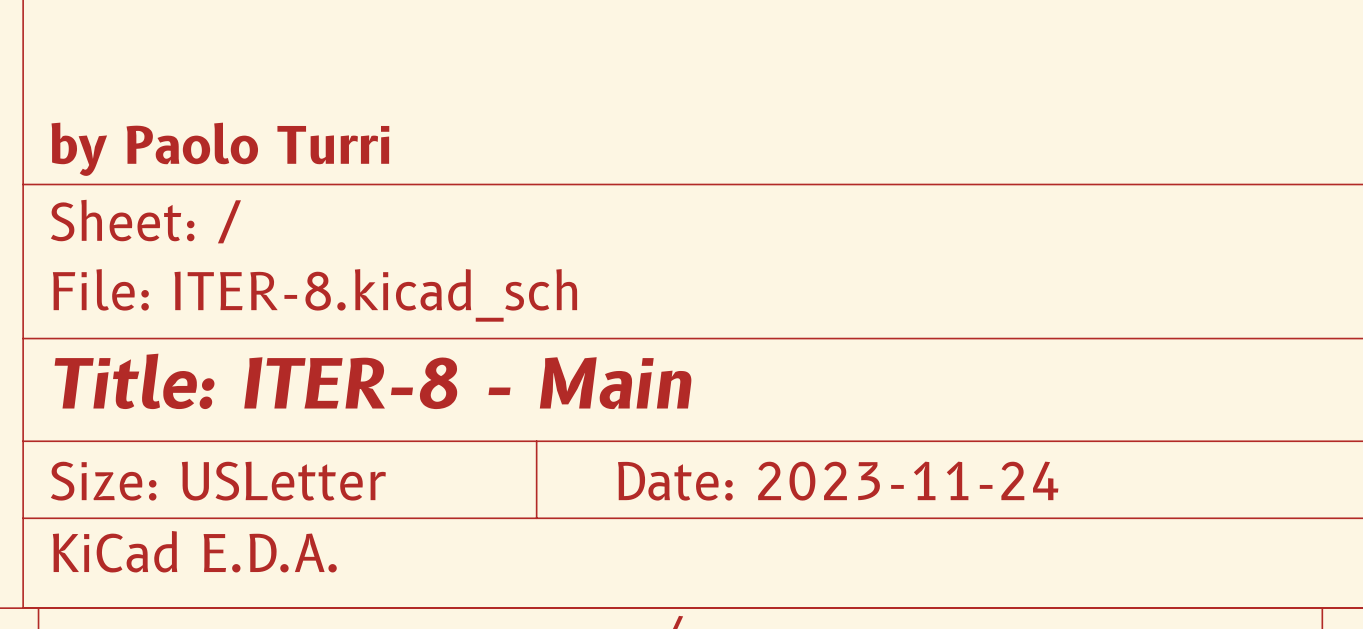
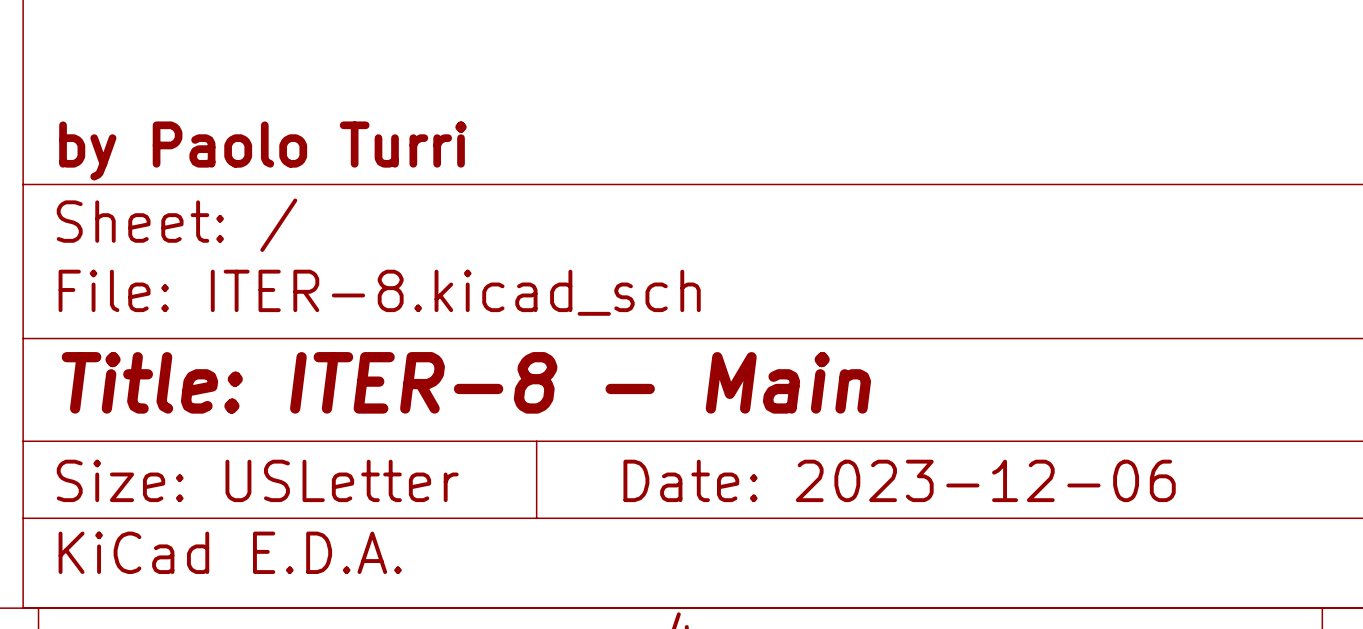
title block: Date: 2023-11-24 (838, 481) -> Date: 2023-12-06 (899, 480)

